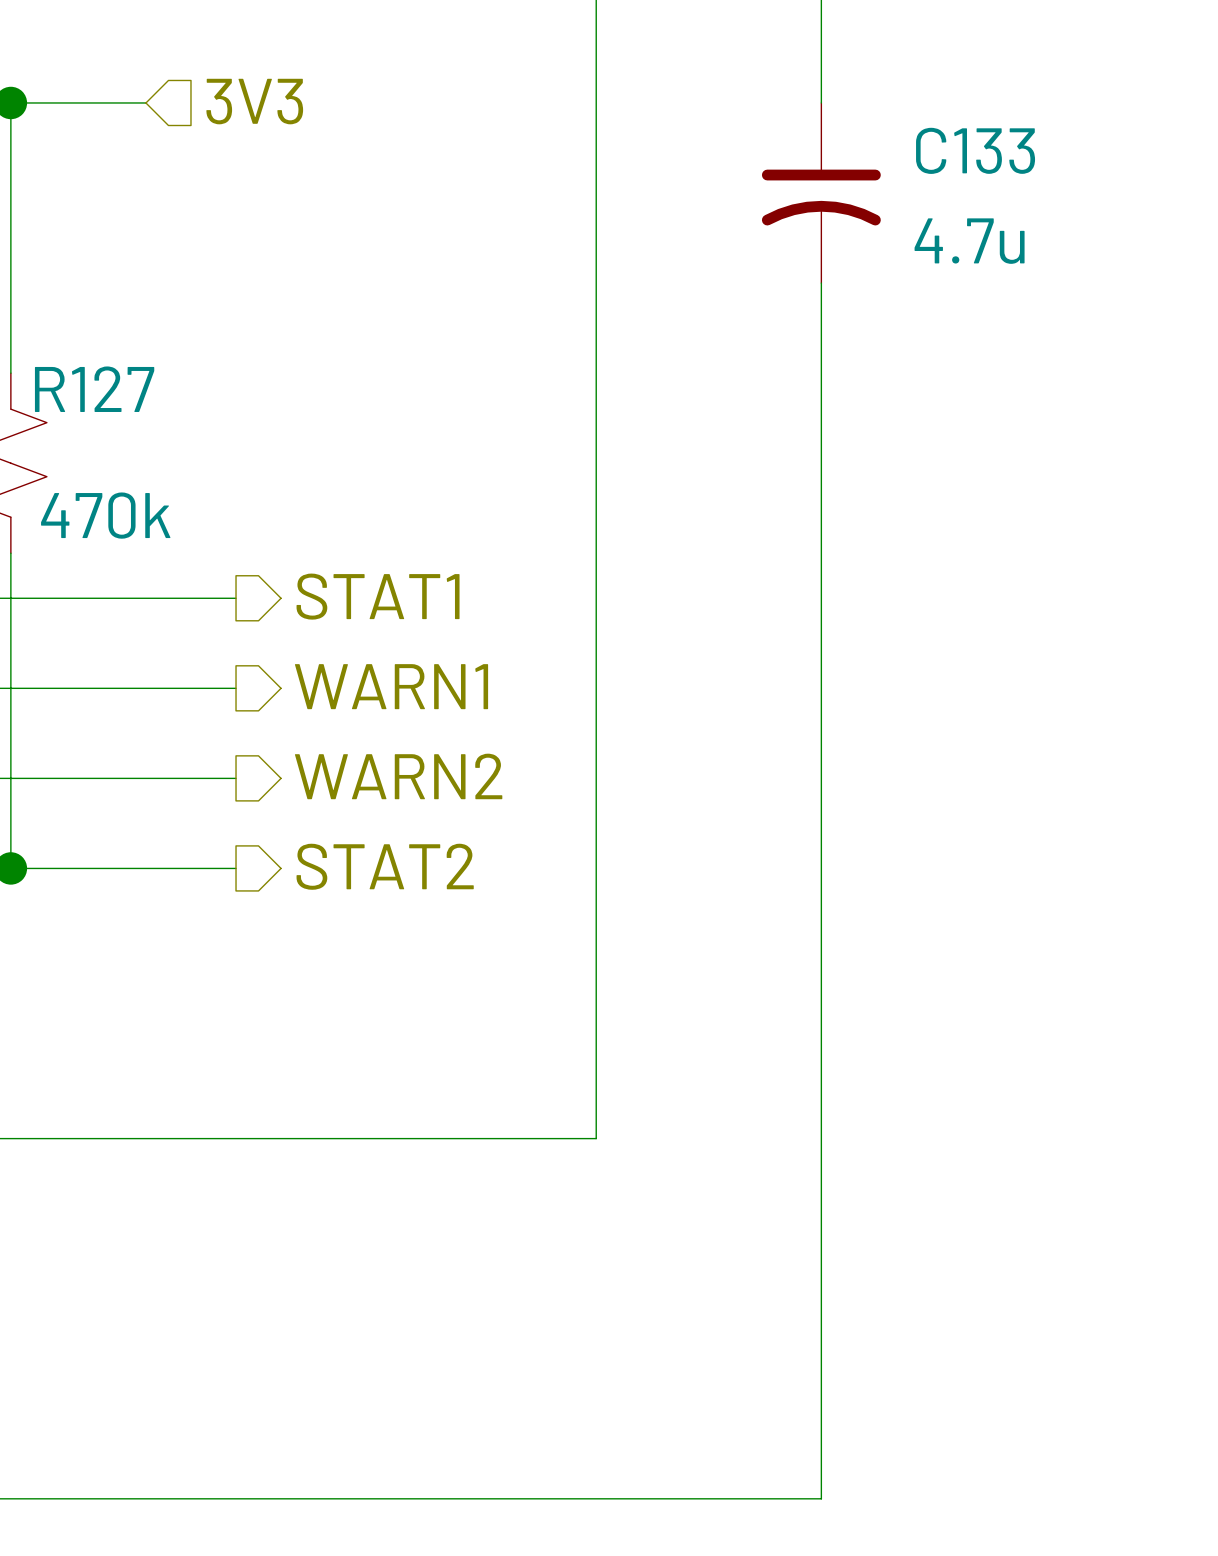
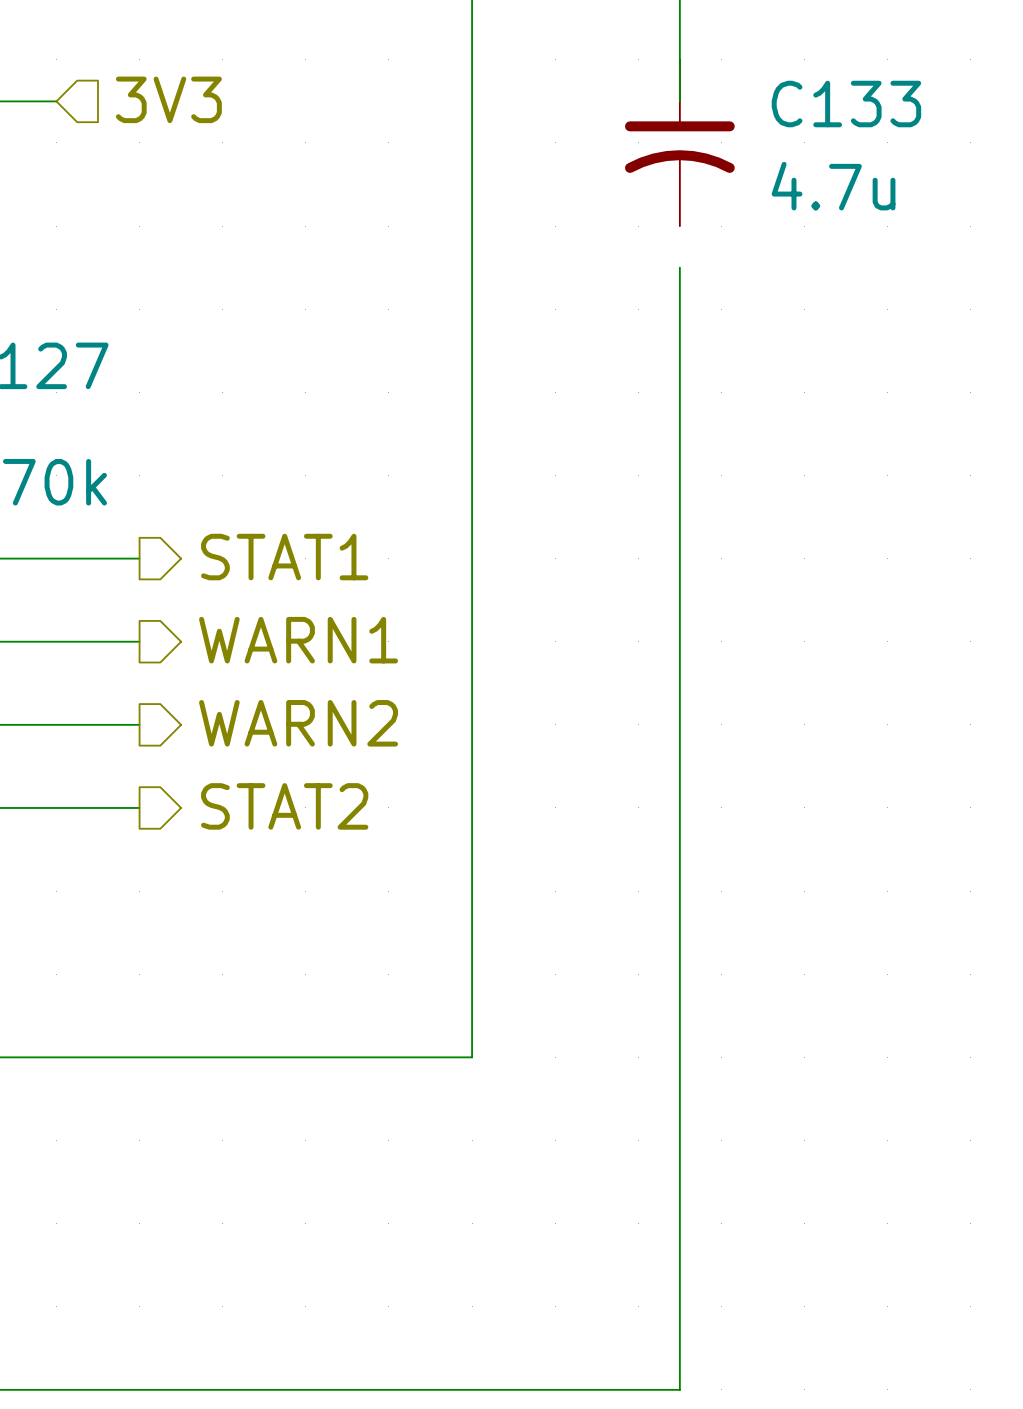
C133 position: (821, 193) -> (679, 142)

